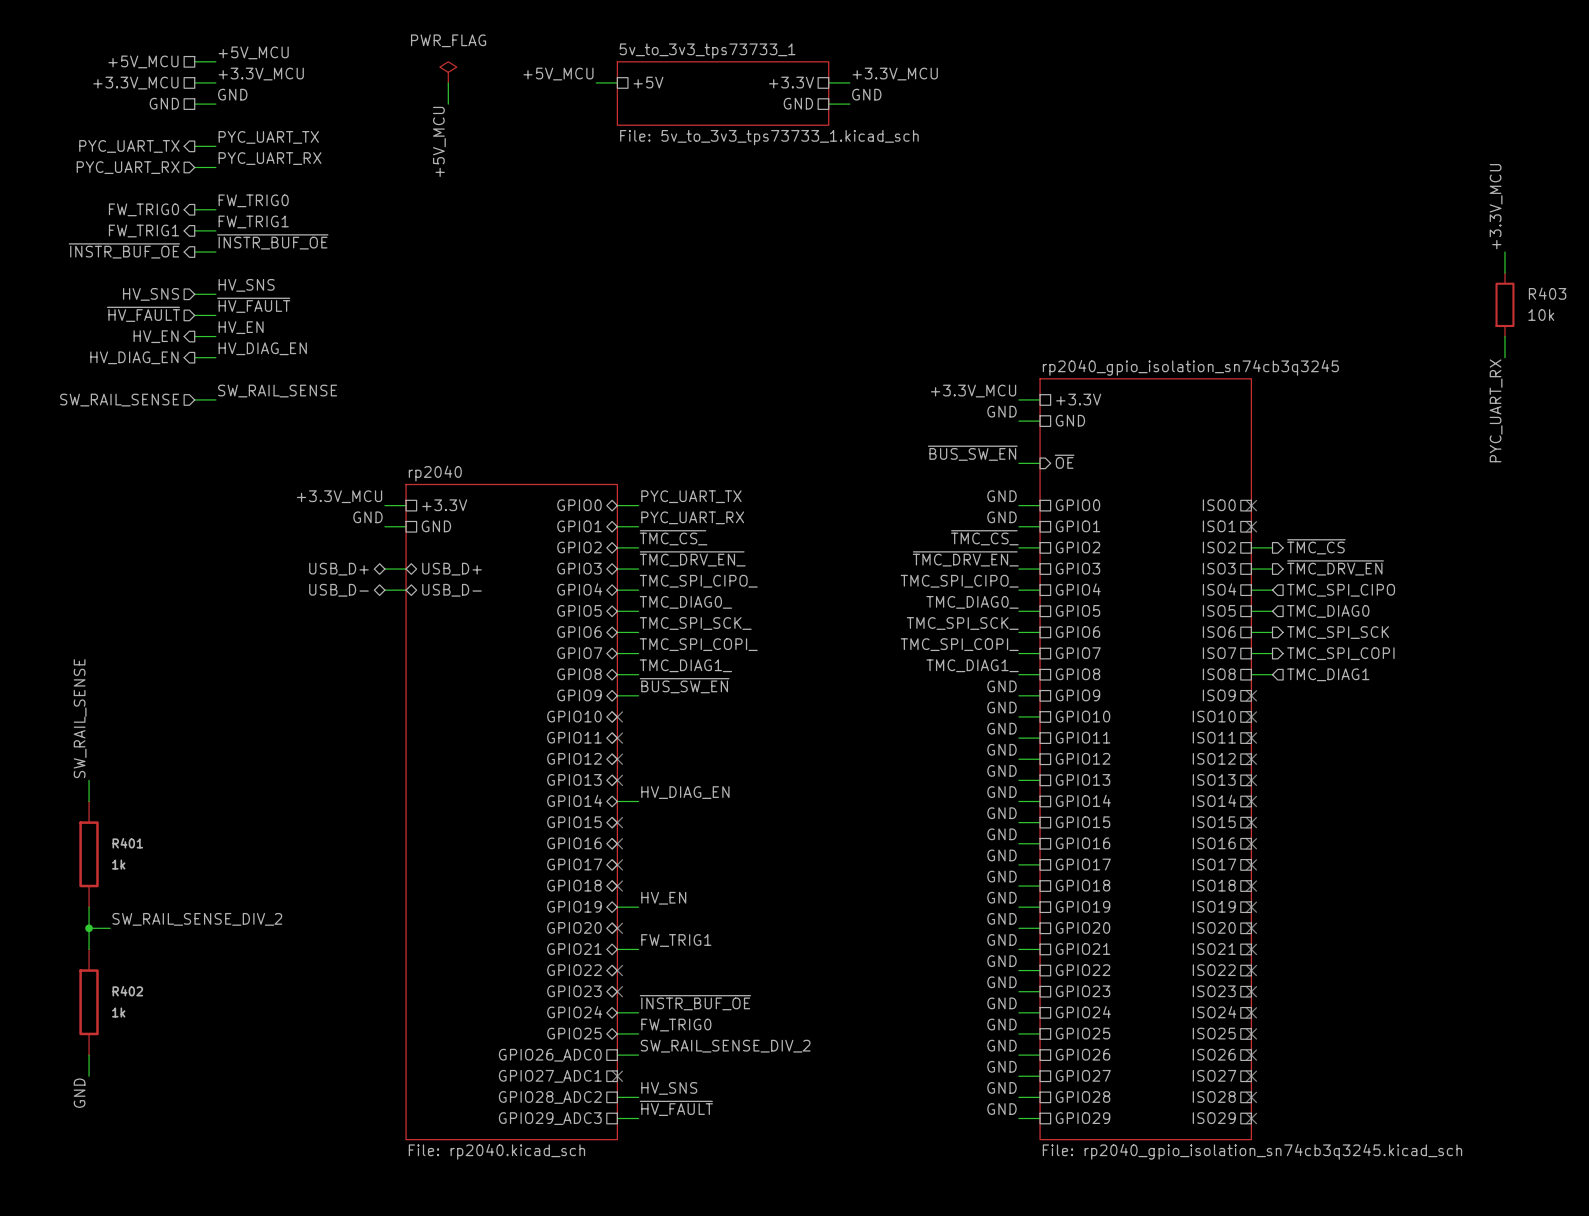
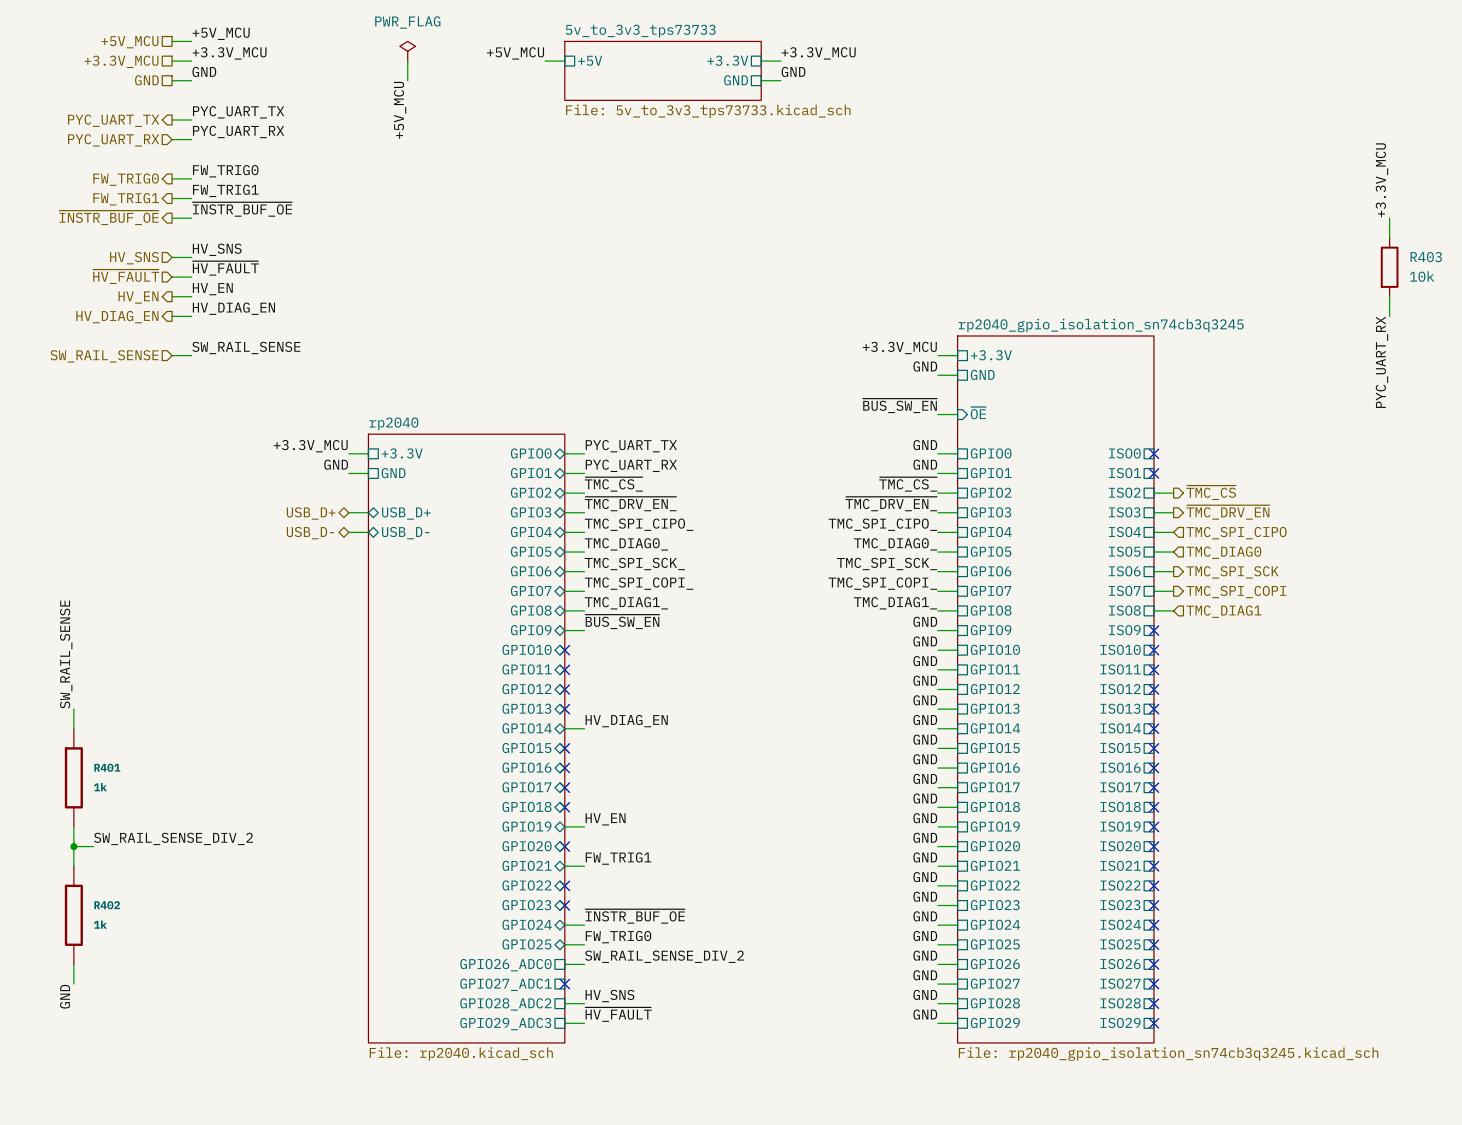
sheet 5v_to_3v3_tps73733_1 name: 5v_to_3v3_tps73733_1 (707, 51) -> 5v_to_3v3_tps73733 (640, 31)
sheet 5v_to_3v3_tps73733_1 value: File: 5v_to_3v3_tps73733_1.kicad_sch (769, 137) -> File: 5v_to_3v3_tps73733.kicad_sch (708, 111)

